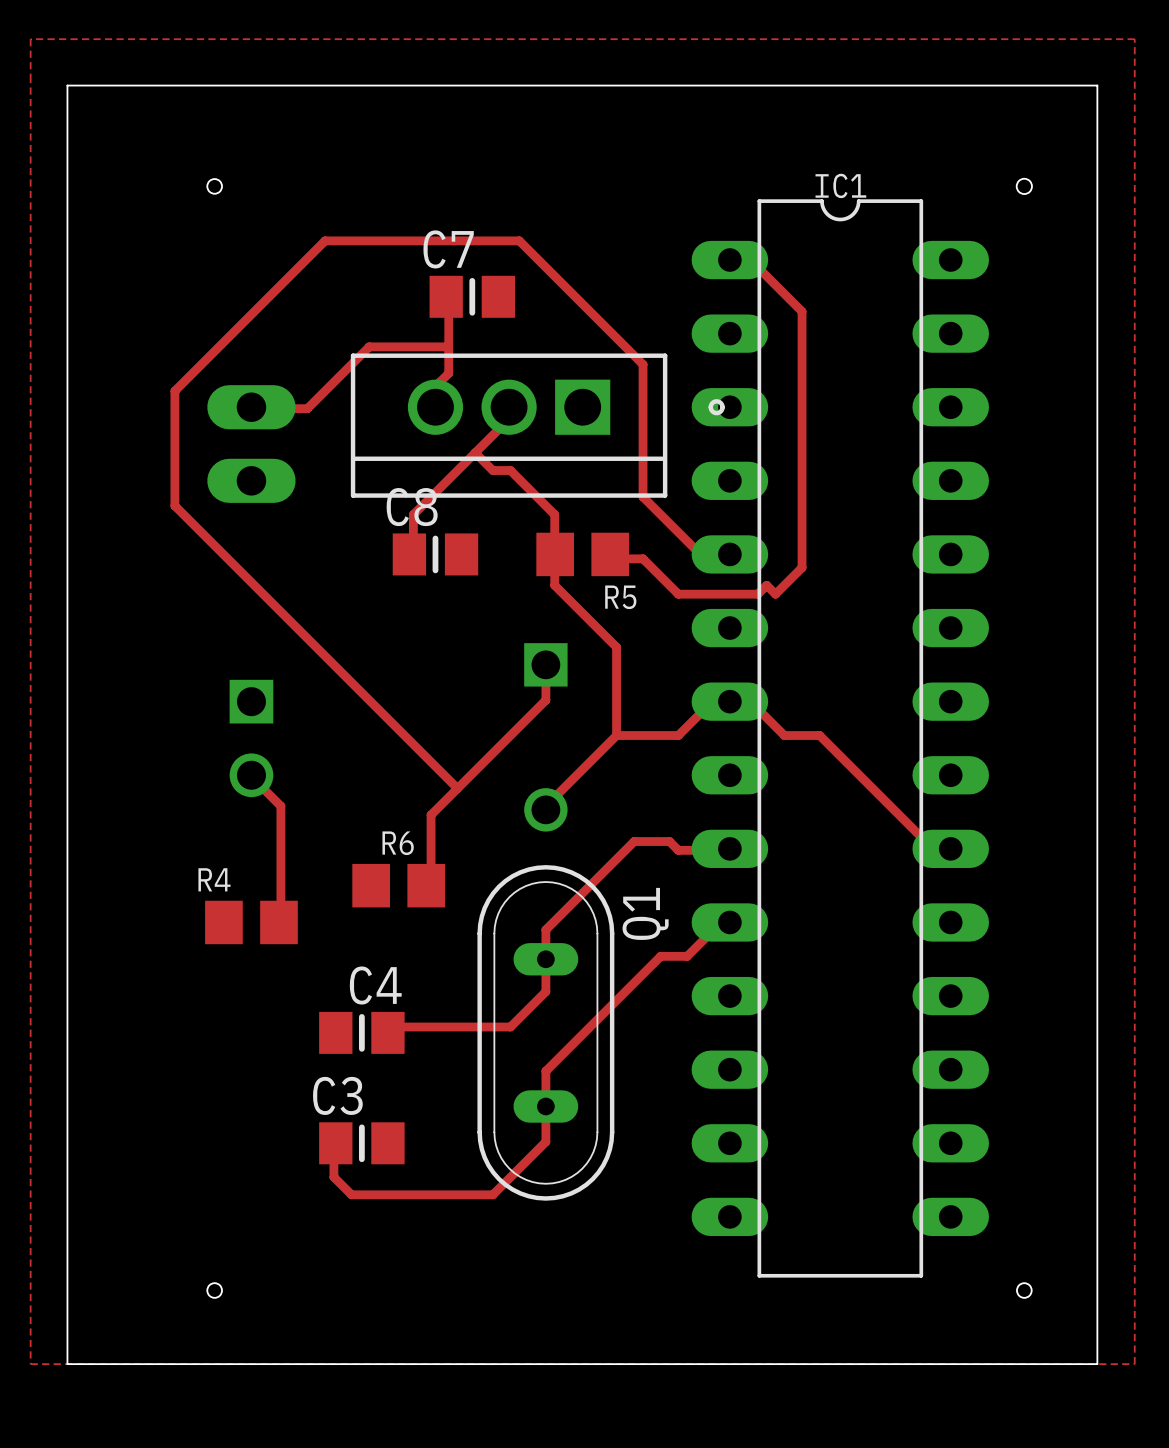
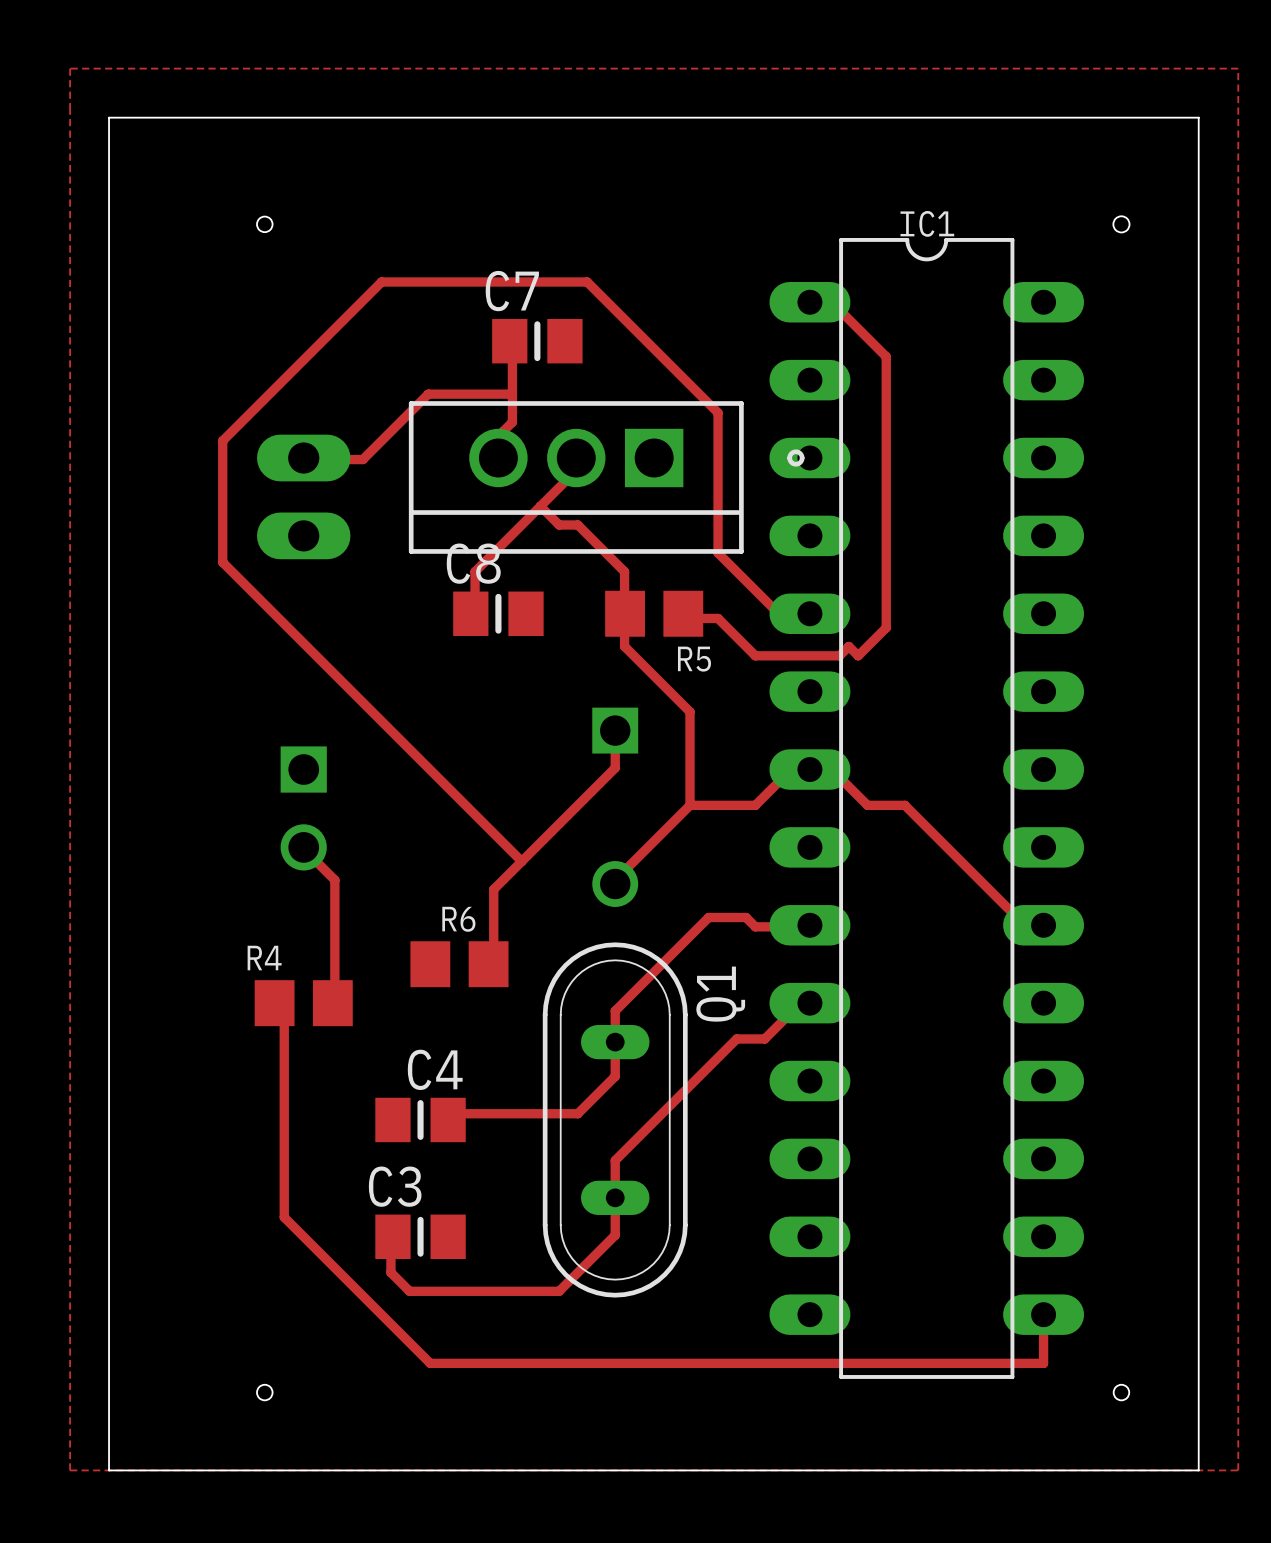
track: none -> (274, 1003) (284, 1003) (284, 1217) (430, 1363) (1043, 1363) (1043, 1314)

